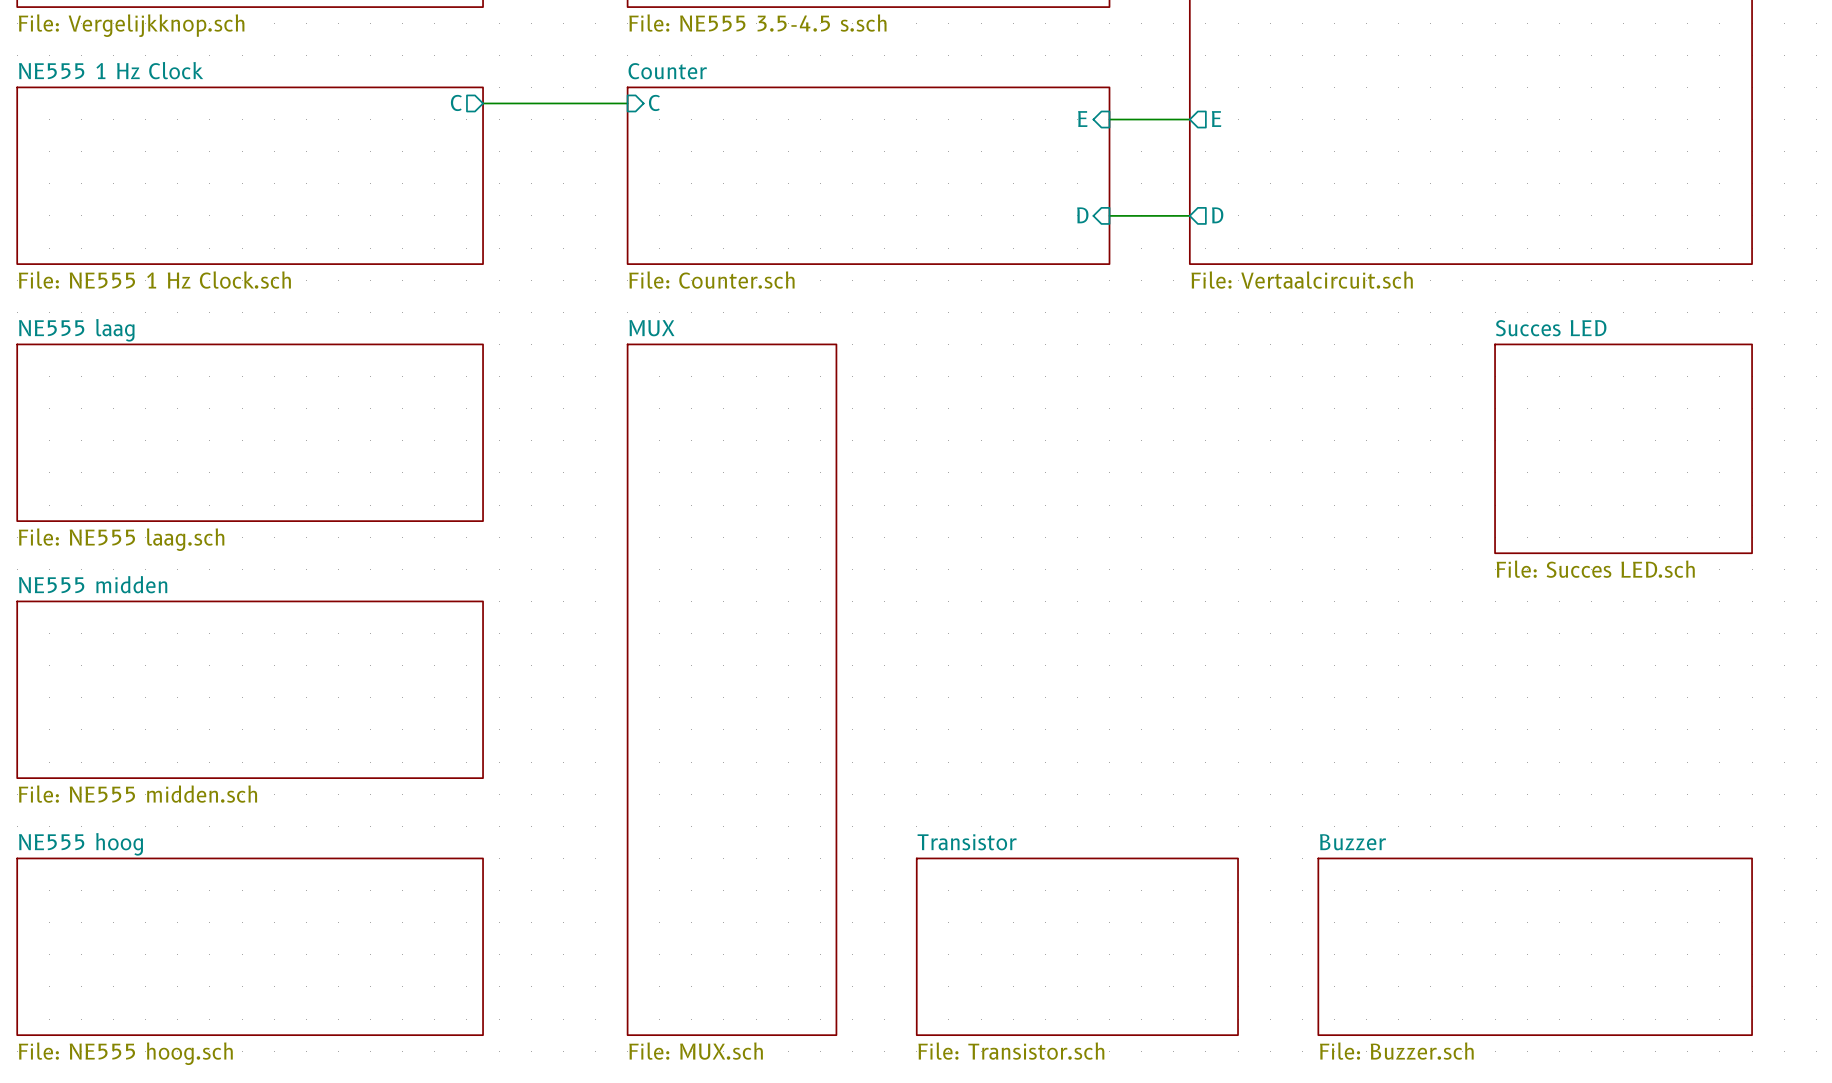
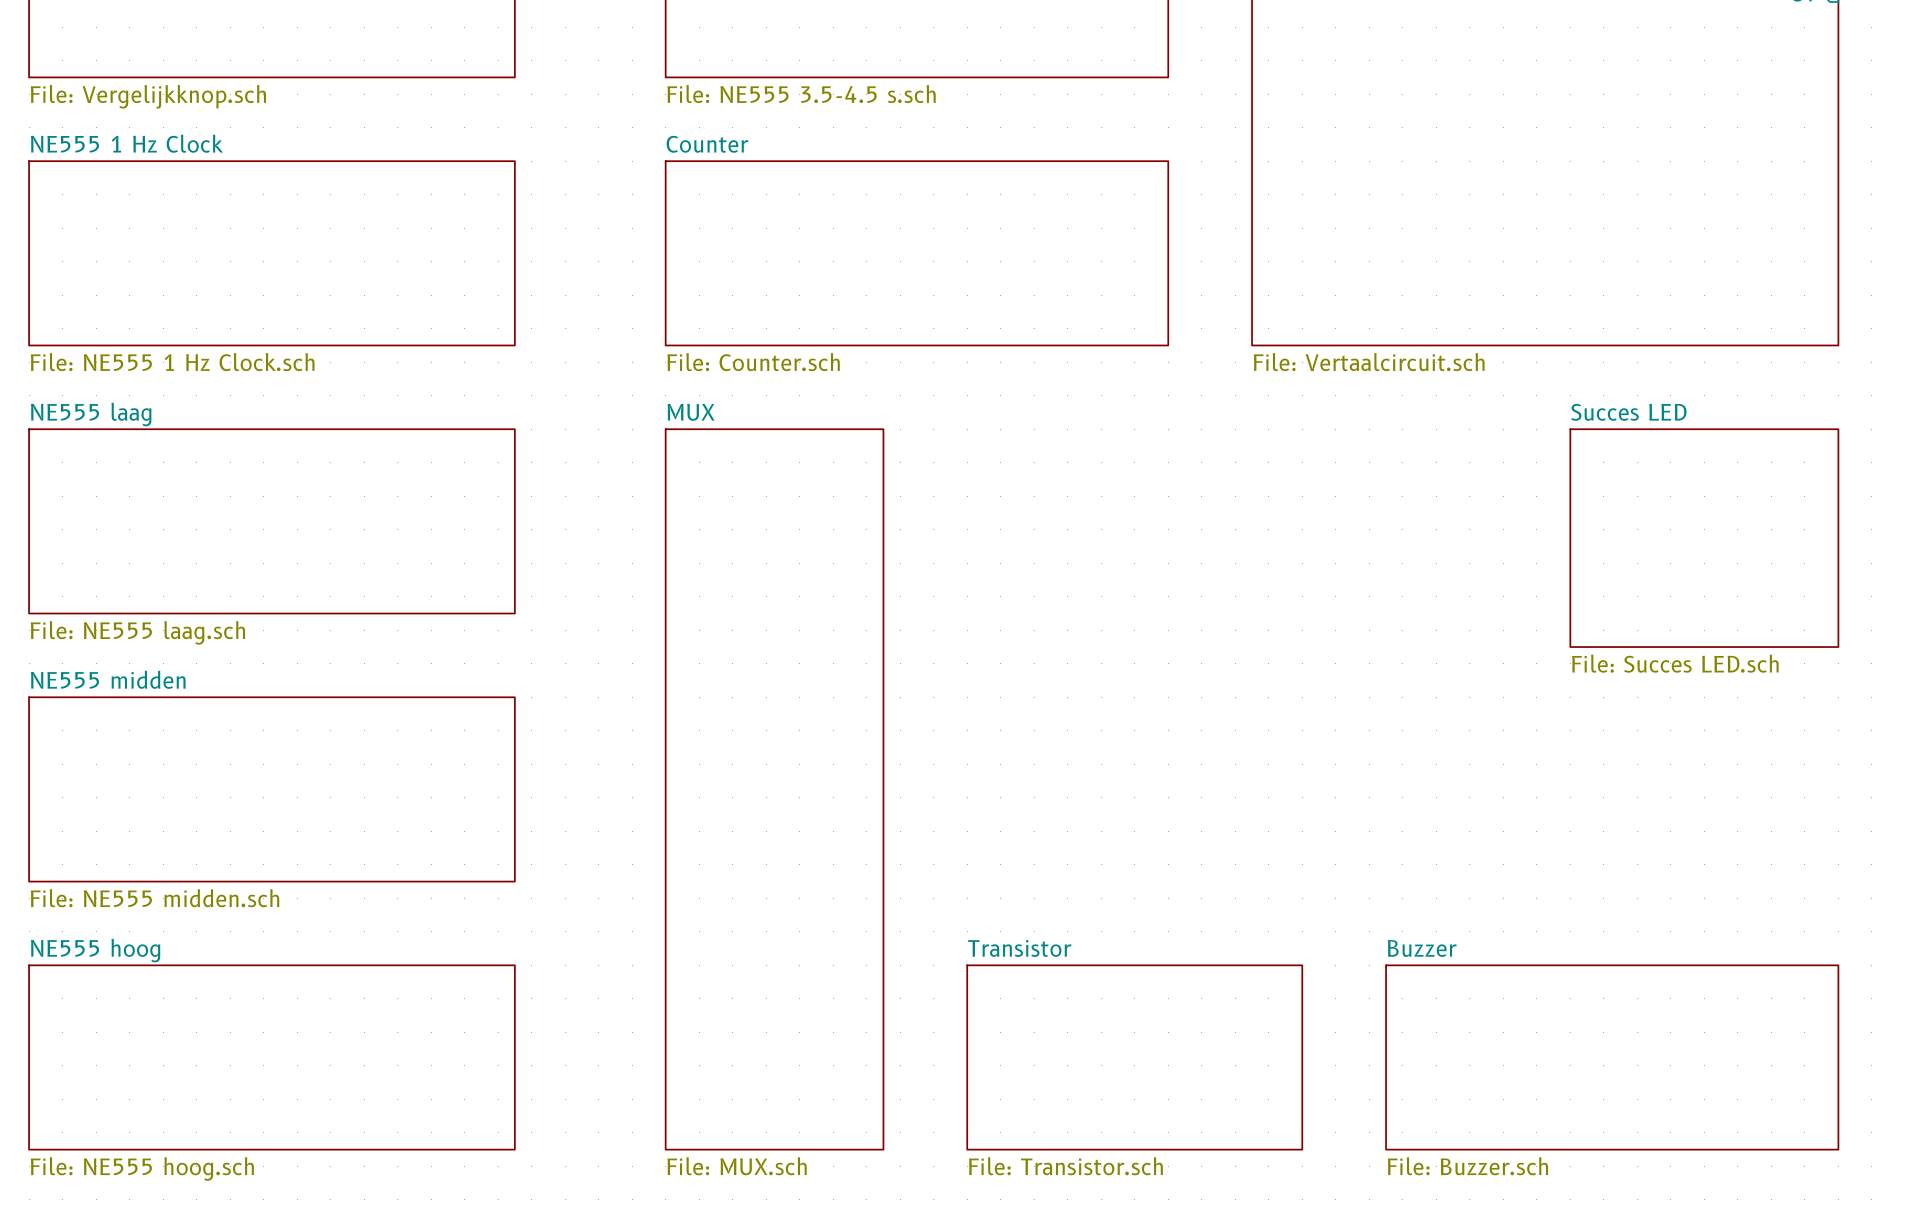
sheet pin: C (456, 102) -> none
sheet pin: C (654, 102) -> none
wire: (483, 103) (627, 103) -> none
sheet pin: E (1082, 119) -> none
wire: (1109, 119) (1189, 119) -> none
sheet pin: E (1216, 119) -> none
sheet pin: D (1082, 215) -> none
wire: (1109, 215) (1189, 215) -> none
sheet pin: D (1217, 215) -> none

